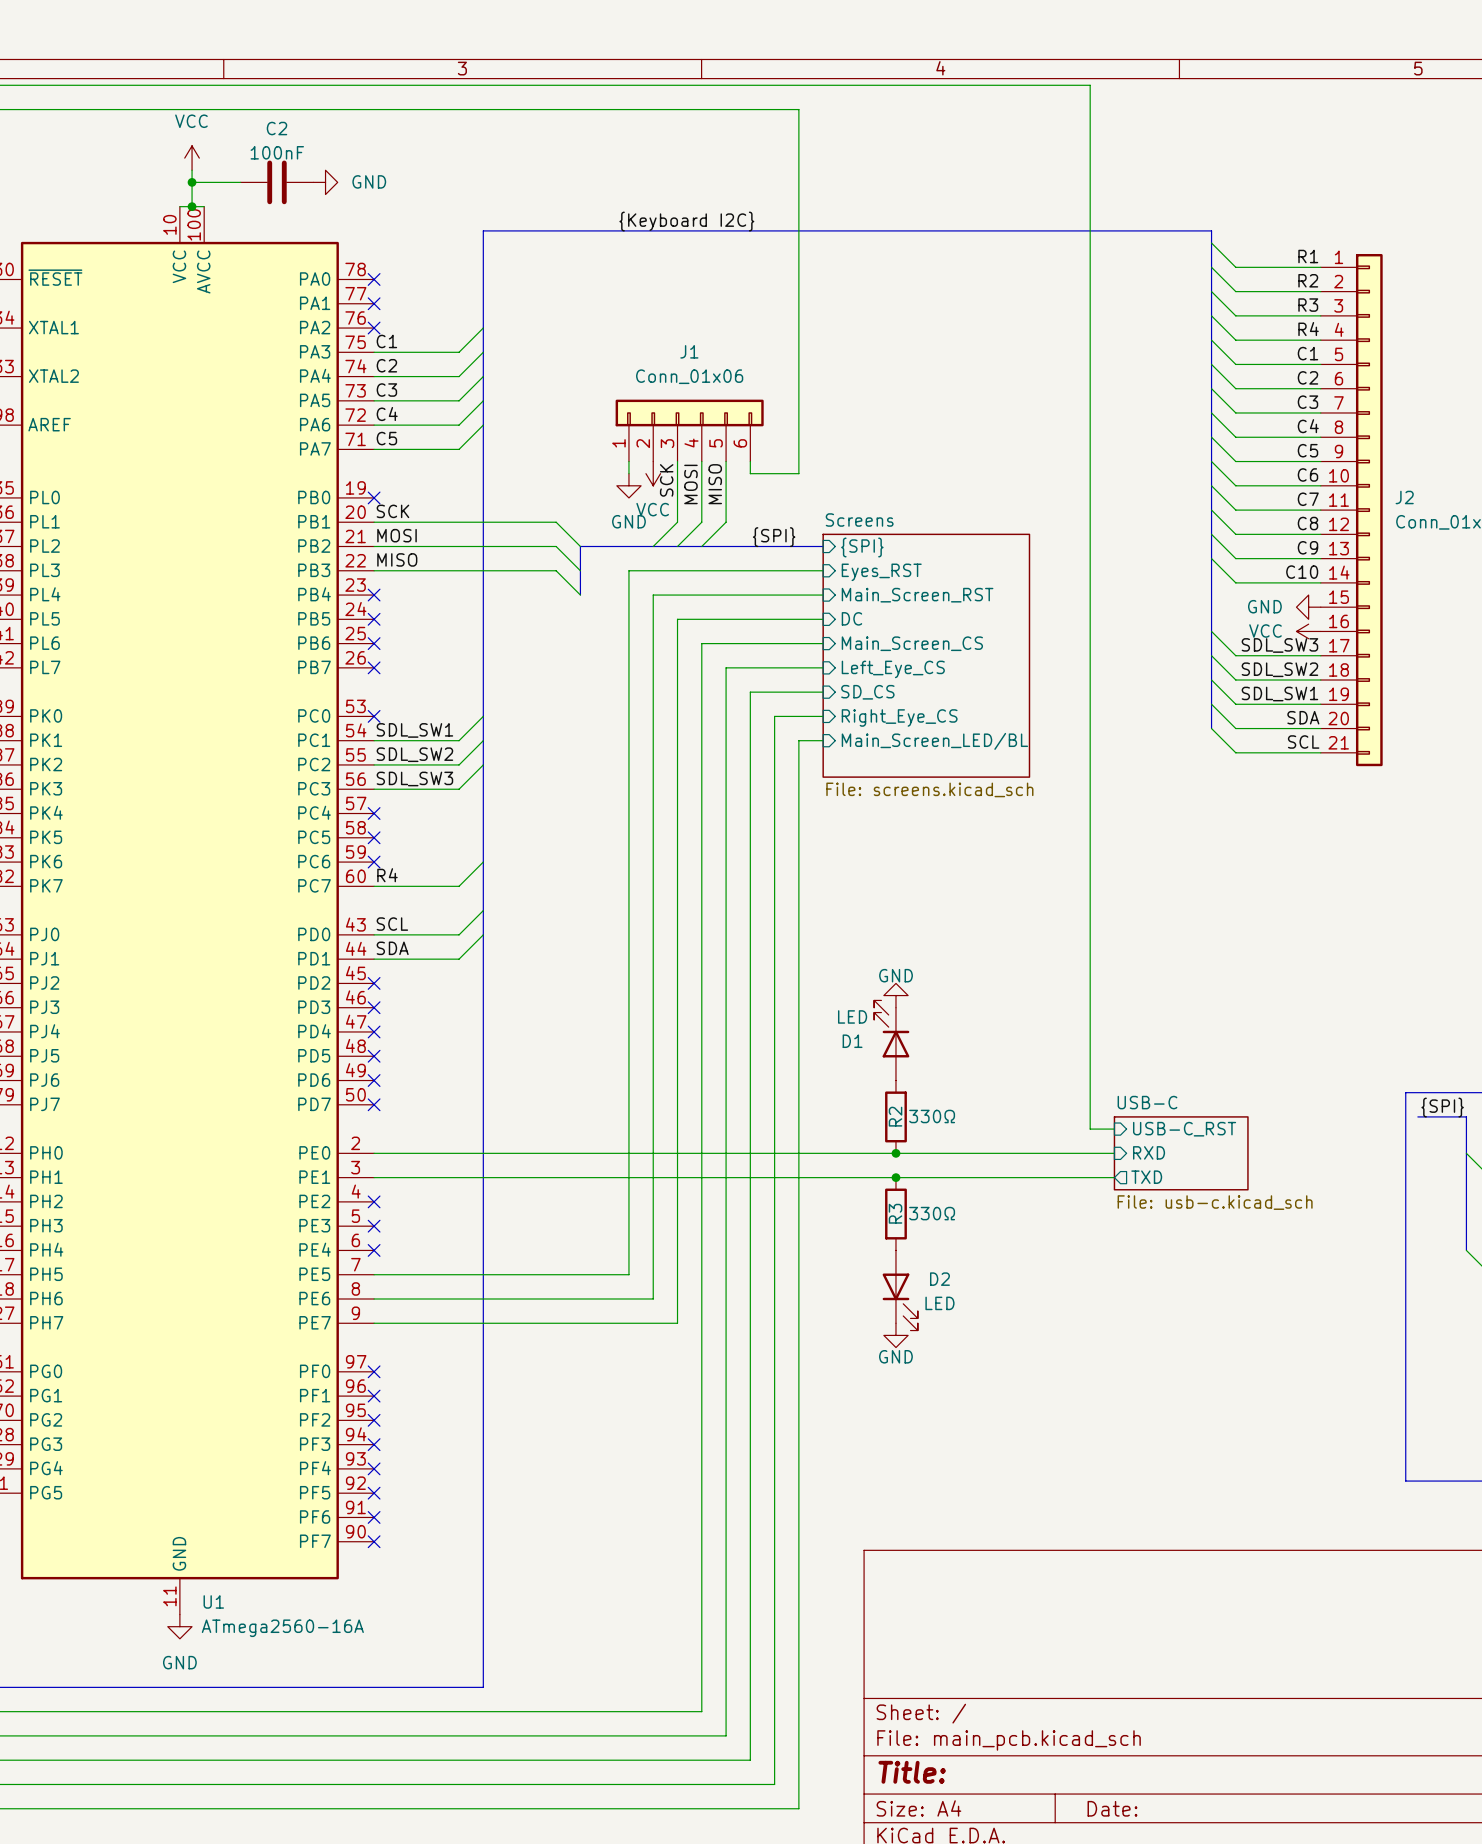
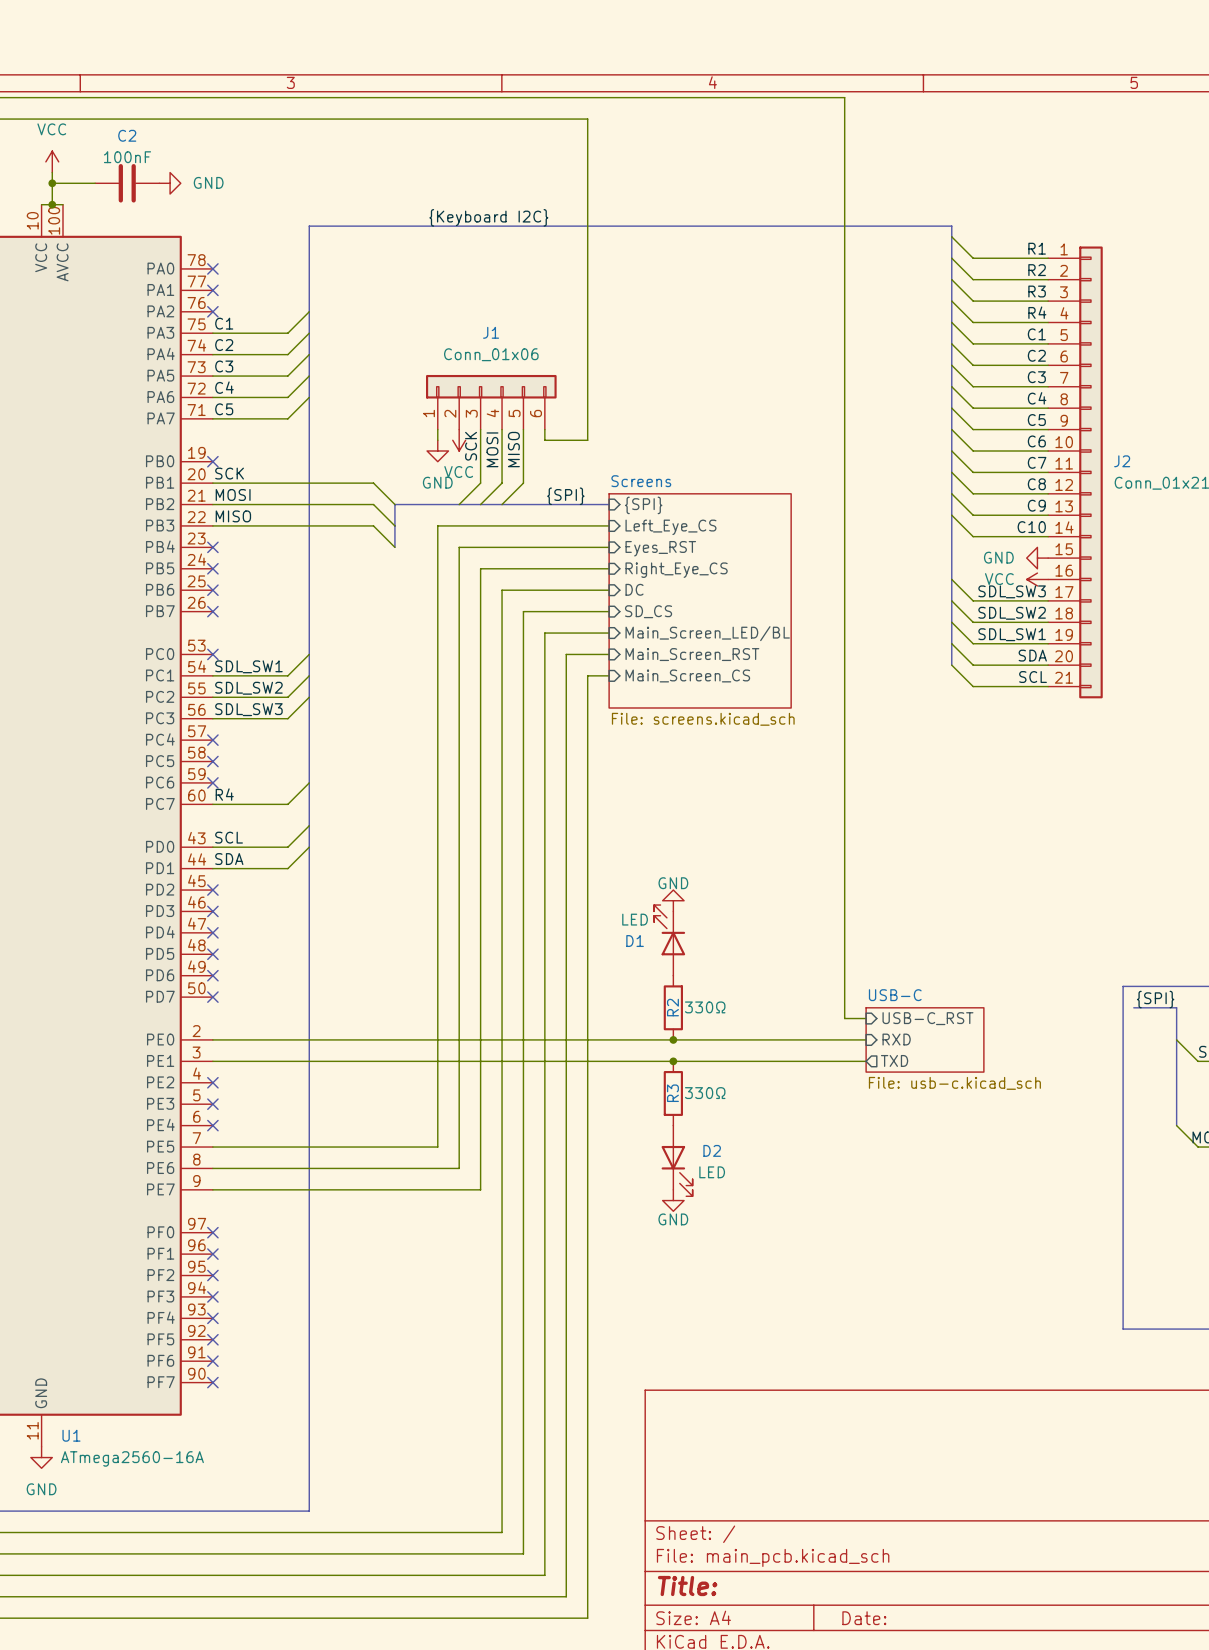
sheet pin: Eyes_RST (881, 572) -> Left_Eye_CS (670, 527)
sheet pin: Main_Screen_RST (917, 595) -> Eyes_RST (660, 548)
sheet pin: DC (851, 618) -> Right_Eye_CS (676, 570)
sheet pin: Main_Screen_CS (912, 643) -> DC (634, 589)
sheet pin: Left_Eye_CS (893, 669) -> SD_CS (648, 611)
sheet pin: SD_CS (867, 692) -> Main_Screen_LED/BL (707, 633)
sheet pin: Right_Eye_CS (899, 717) -> Main_Screen_RST (692, 654)
sheet pin: Main_Screen_LED/BL (934, 741) -> Main_Screen_CS (687, 675)

